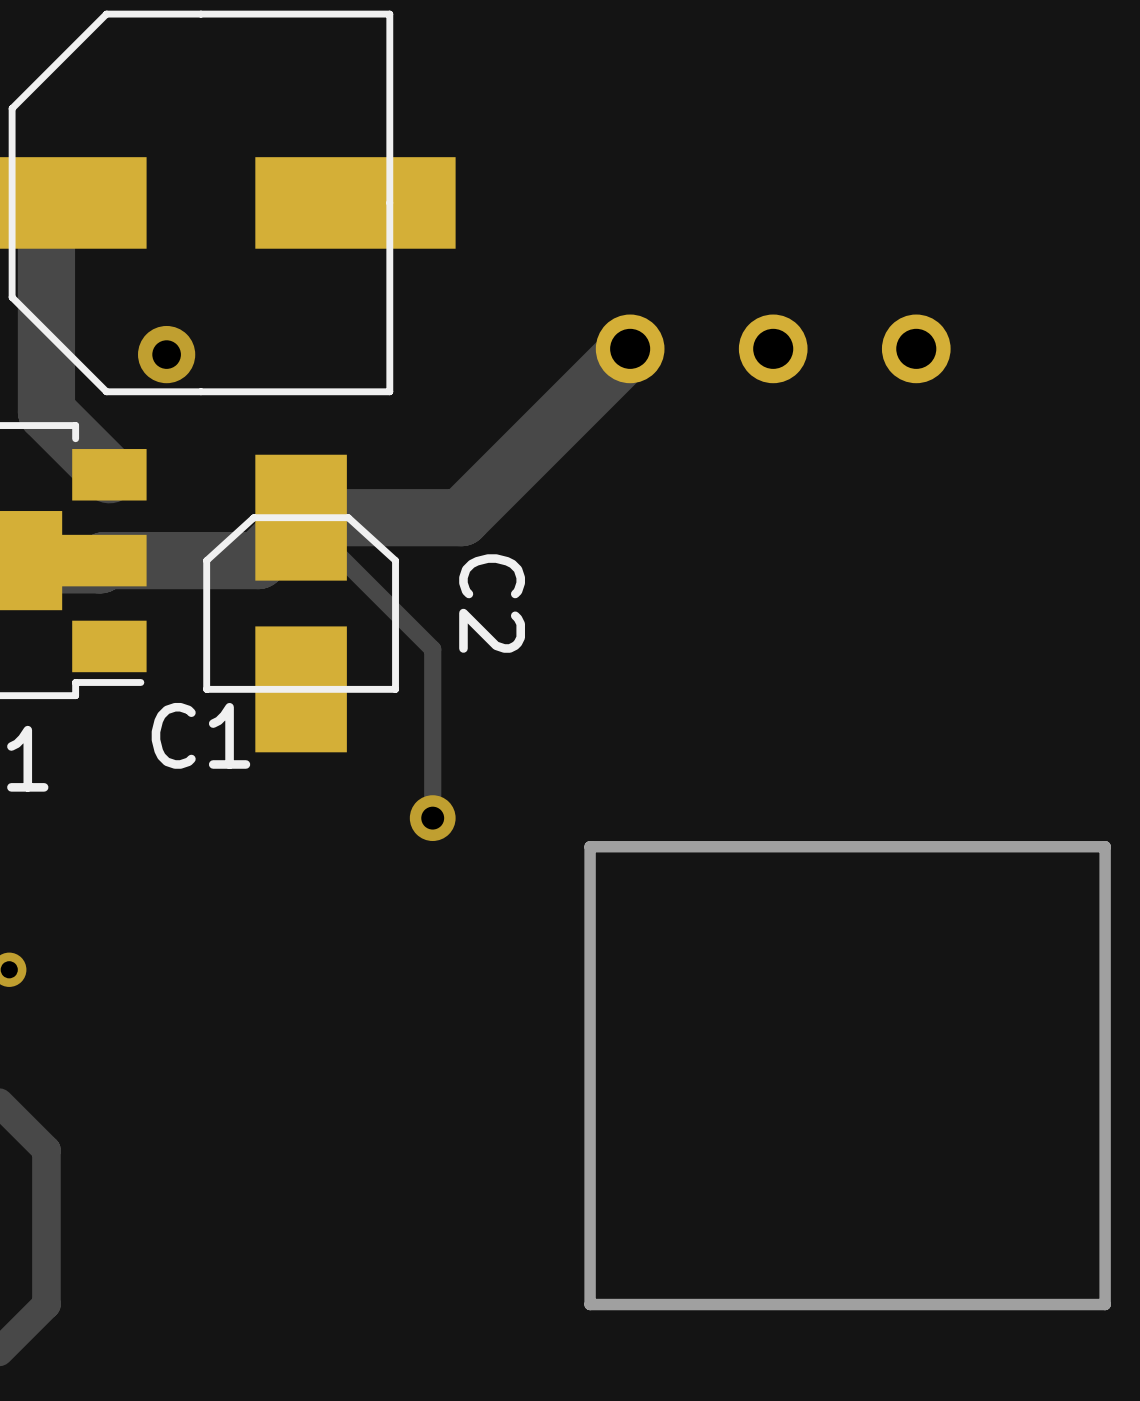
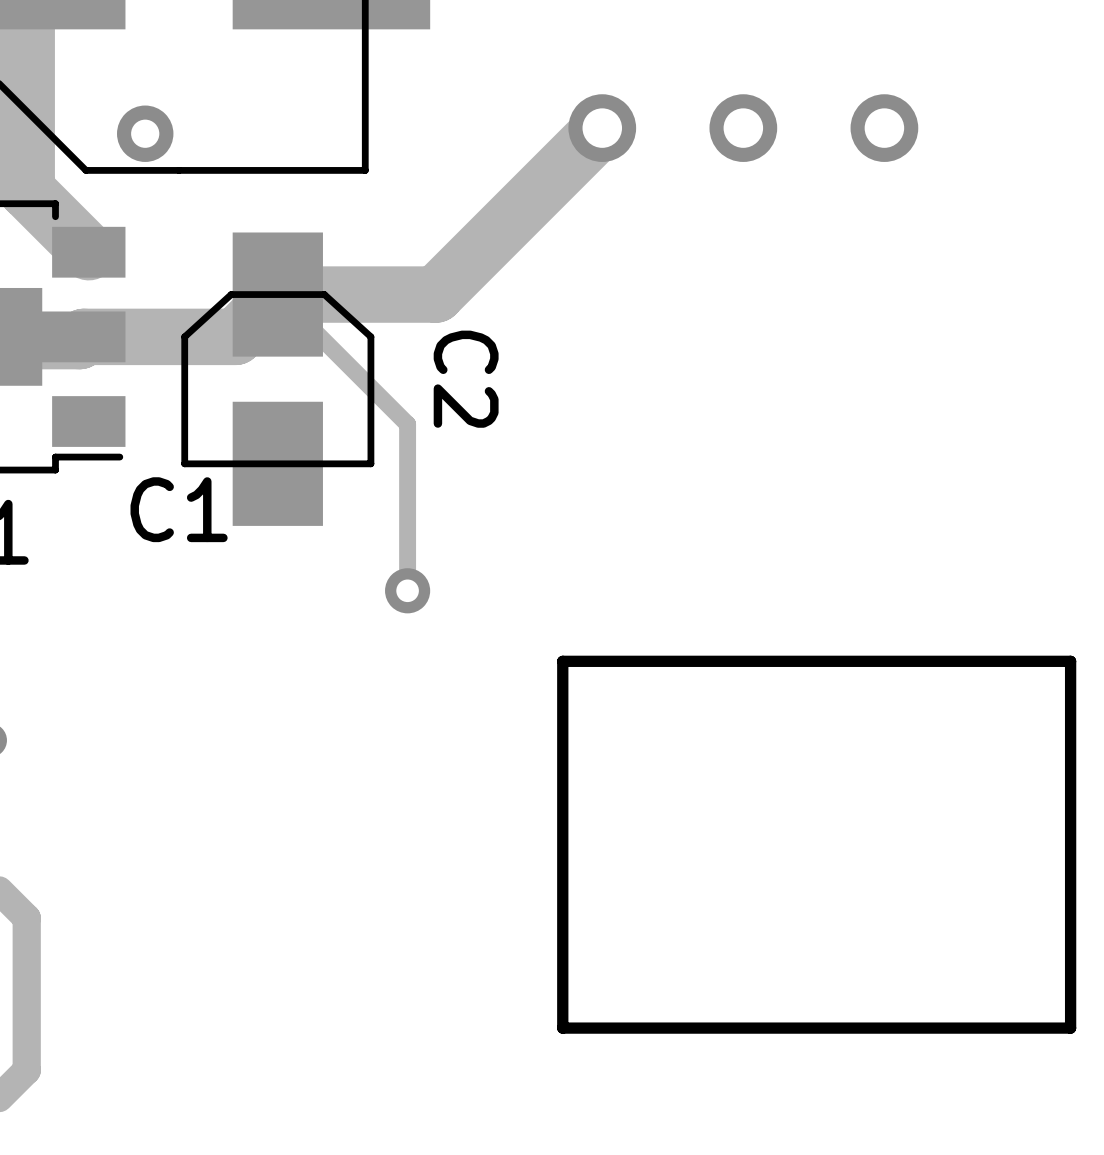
board edge: (1105, 889) (1105, 846) (590, 846) (590, 889) -> (1070, 661) (562, 661)
board edge: (1105, 1261) (1105, 1304) (590, 1304) (590, 1261) -> (1070, 1028) (562, 1028)

